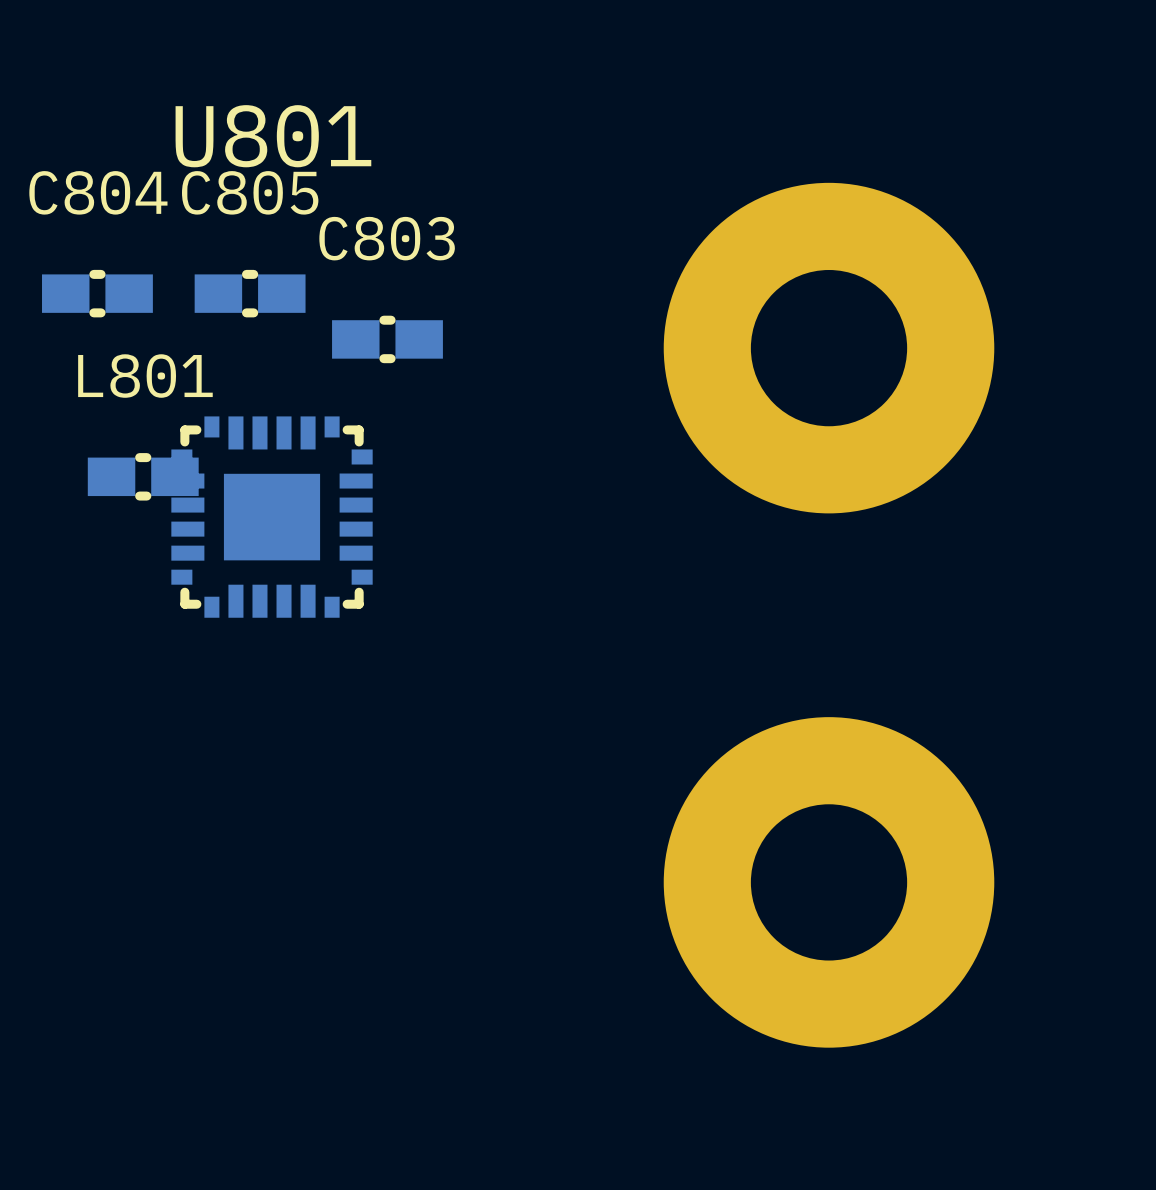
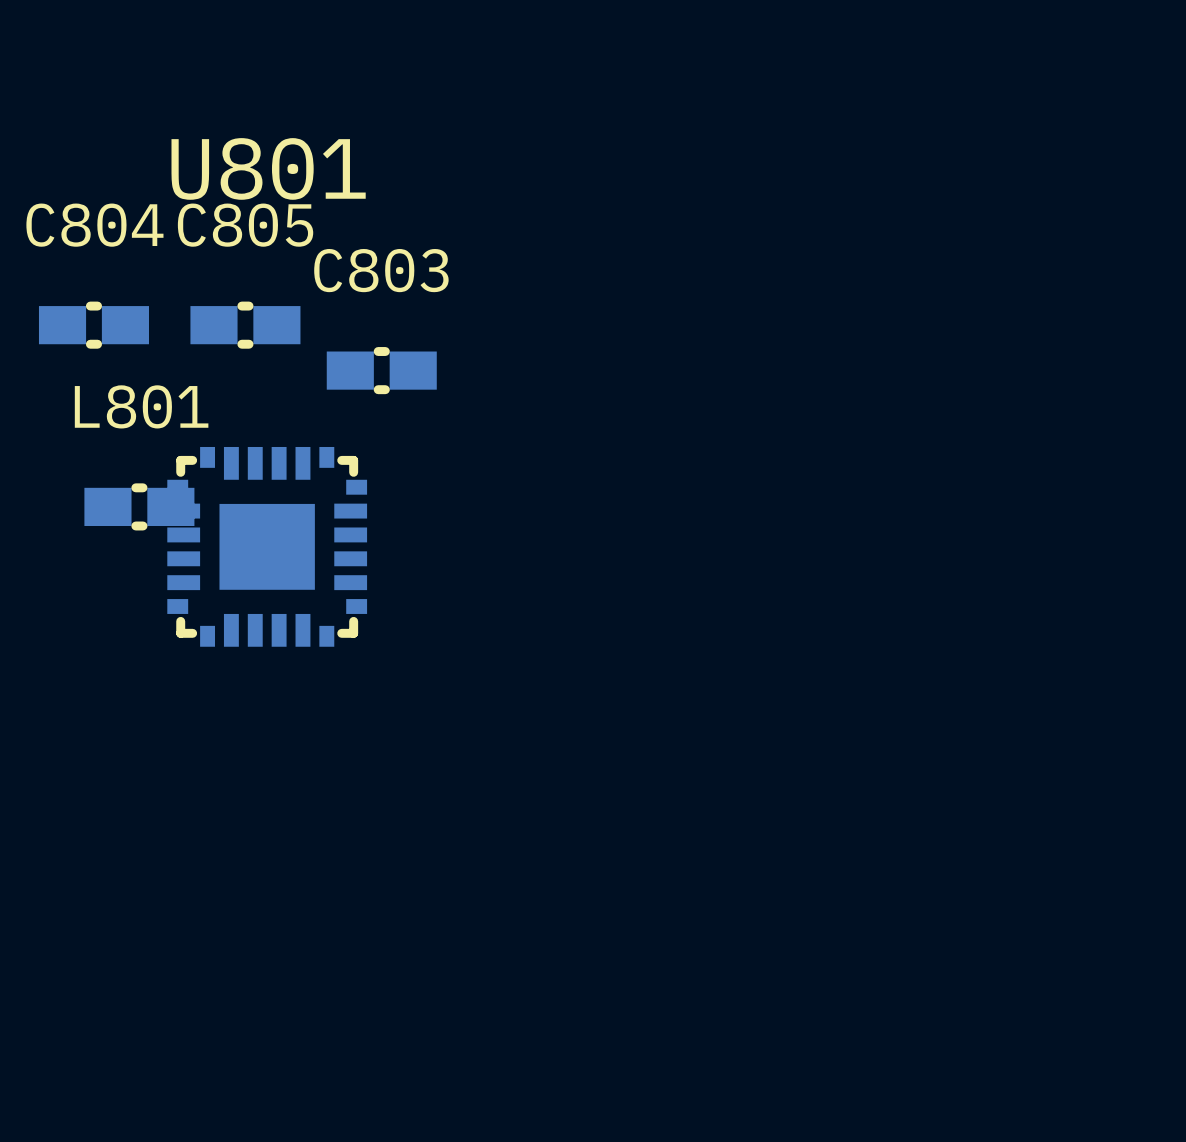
part: (829, 348) -> none
part: (829, 882) -> none

